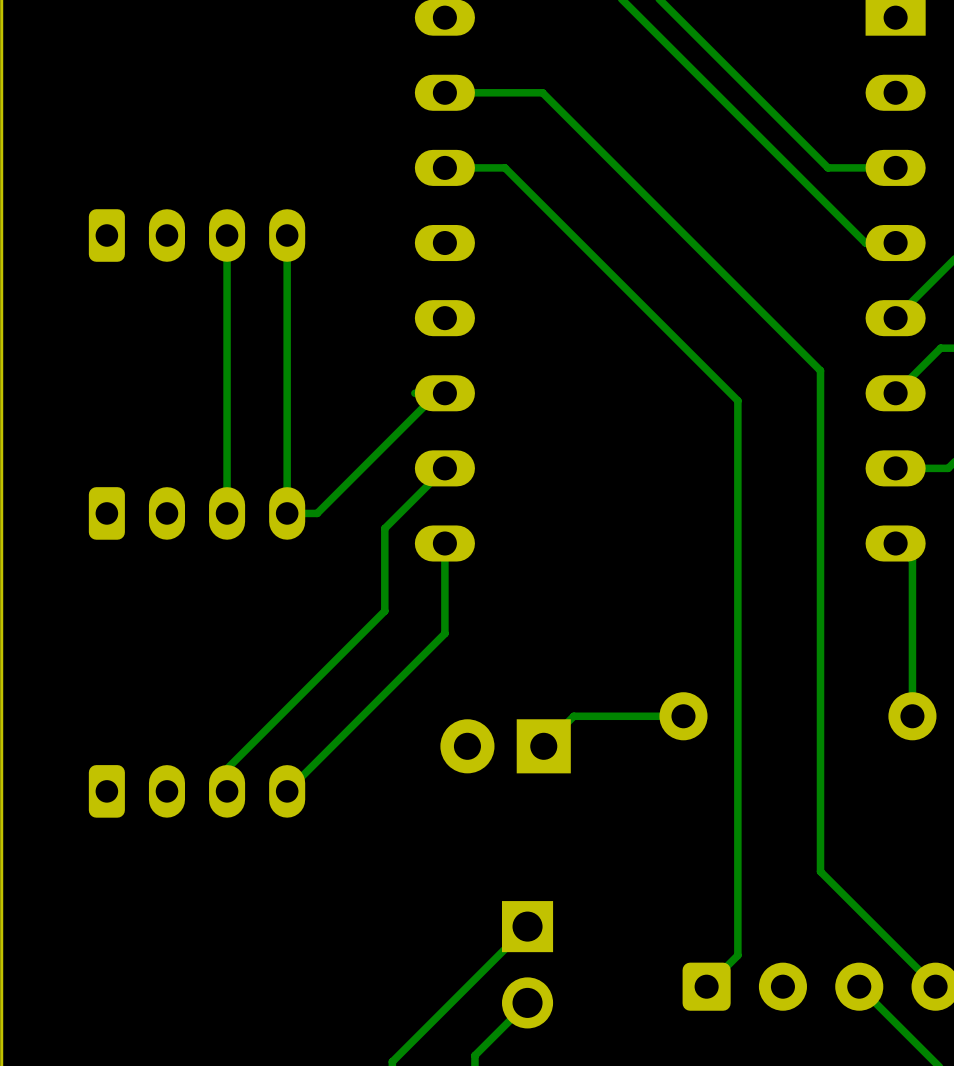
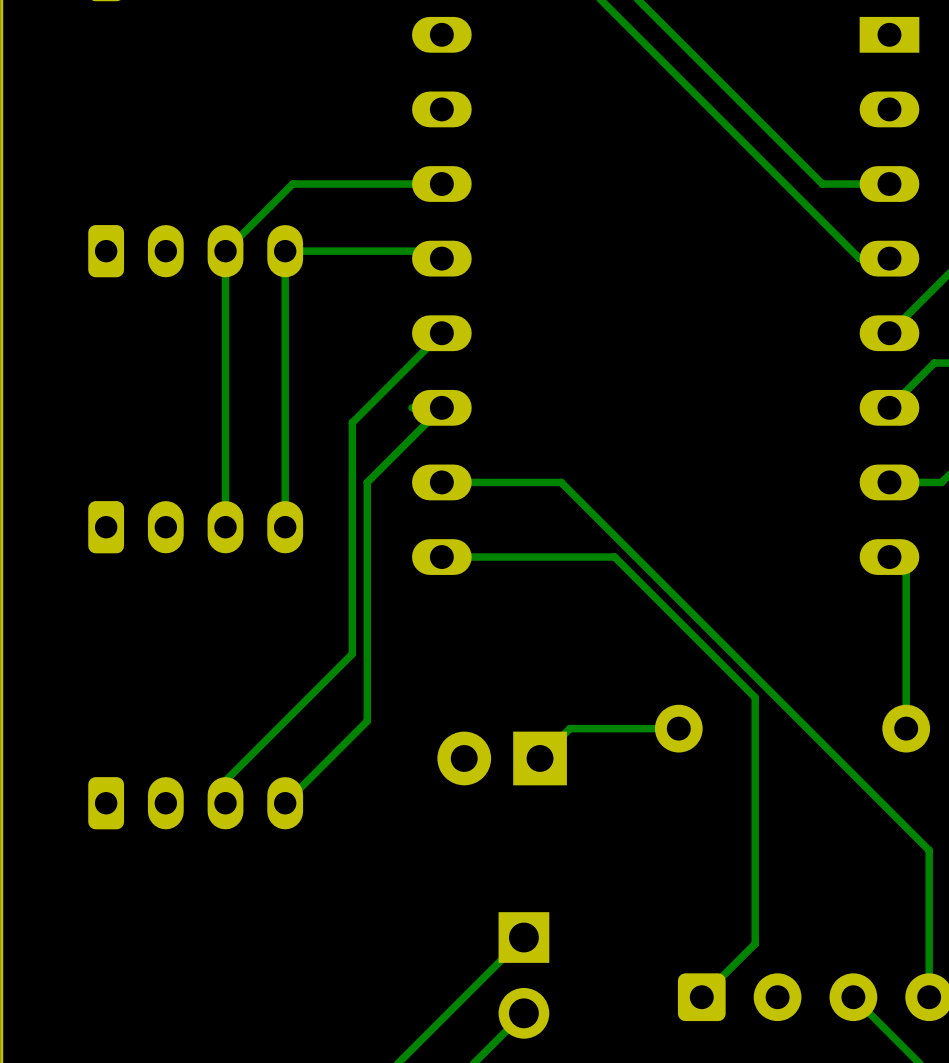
track: (444, 92) (542, 92) (820, 370) (820, 871) (935, 986) -> (441, 482) (561, 482) (929, 850) (929, 997)
track: (444, 167) (505, 167) (737, 400) (737, 955) -> (441, 557) (614, 557) (755, 697) (755, 943) (732, 966)
track: none -> (441, 184) (292, 184) (225, 251)
track: none -> (434, 251) (285, 251)
track: (437, 393) (317, 513) (287, 513) -> none
track: (444, 468) (384, 528) (384, 611) (354, 641) -> (441, 333) (352, 422) (352, 654)
track: (444, 543) (444, 633) (369, 708) -> (441, 407) (367, 482) (367, 721)

